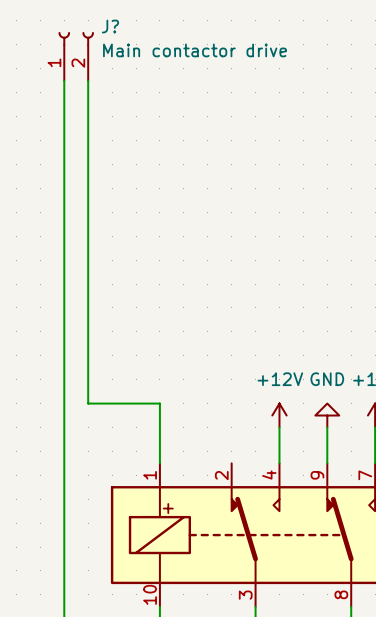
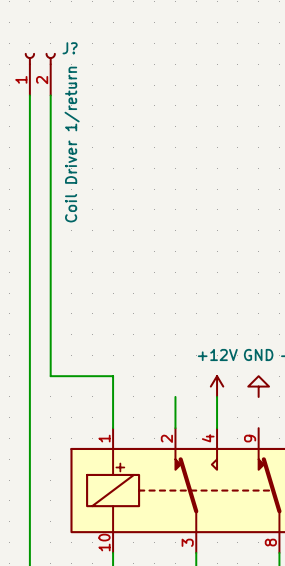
J? value: Main contactor drive (195, 50) -> Coil Driver 1/return (72, 144)
wire: (327, 427) (327, 463) -> (175, 396) (175, 428)

